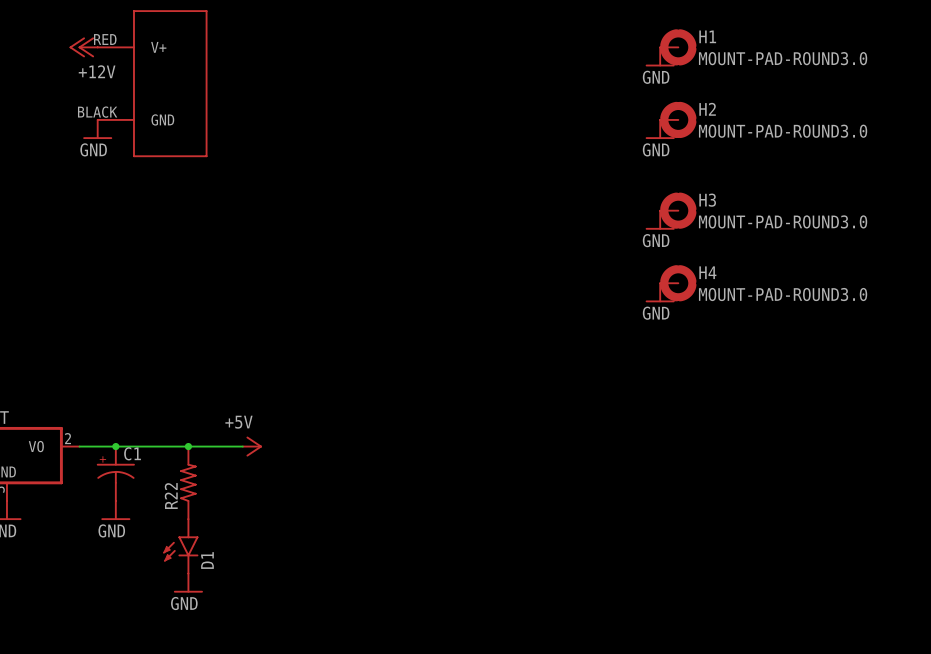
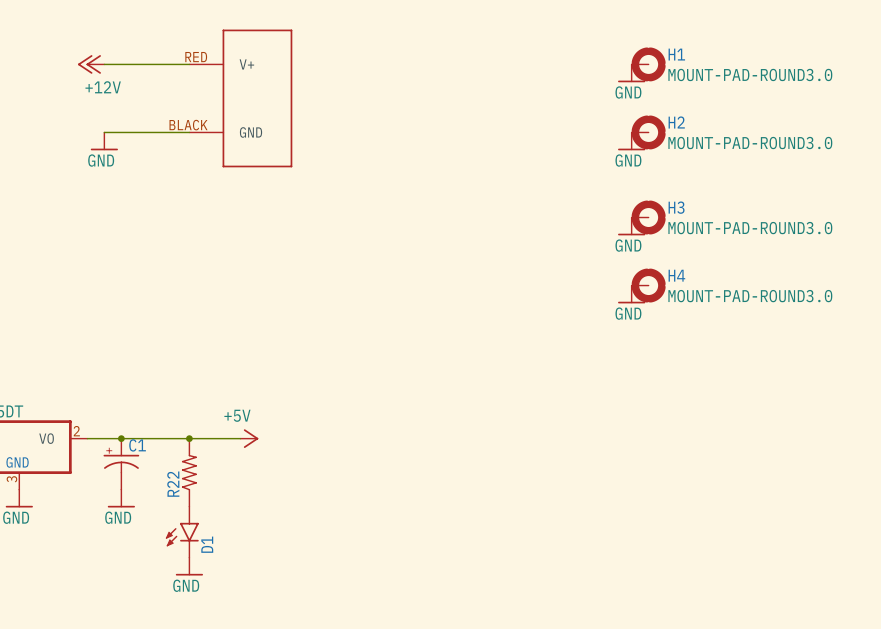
wire: none -> (104, 64) (189, 64)
part position: (152, 83) -> (240, 98)
wire: none -> (104, 132) (189, 132)

